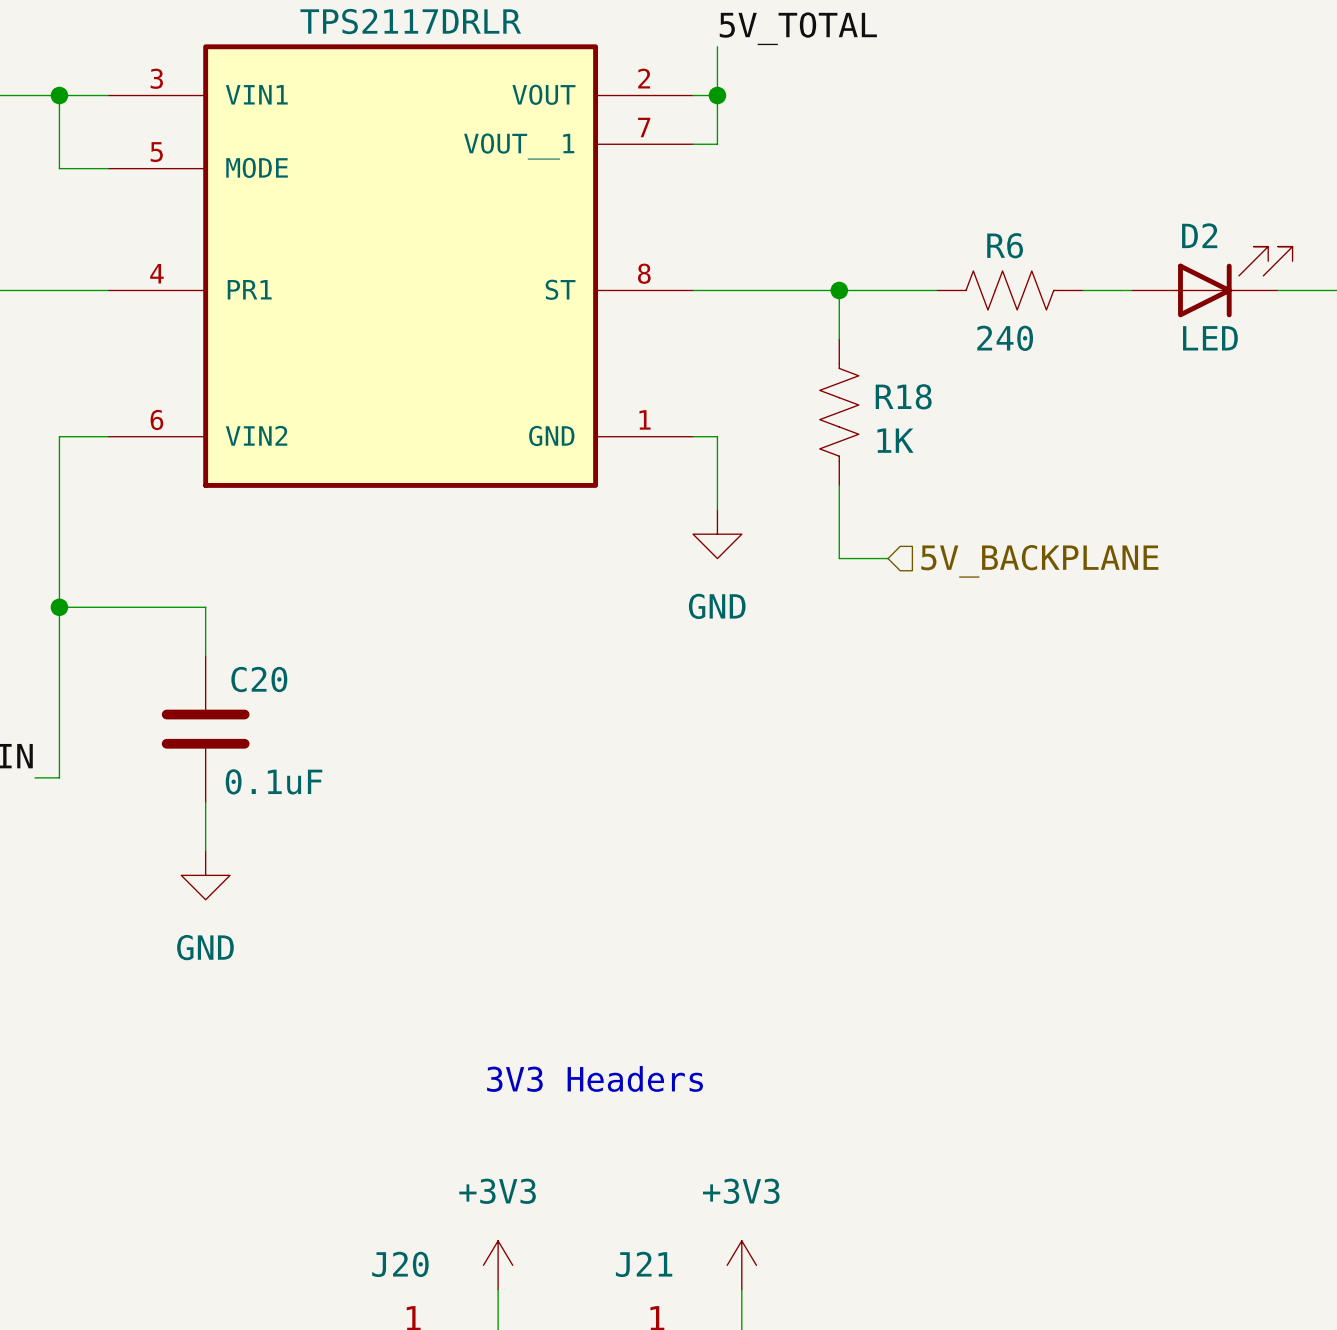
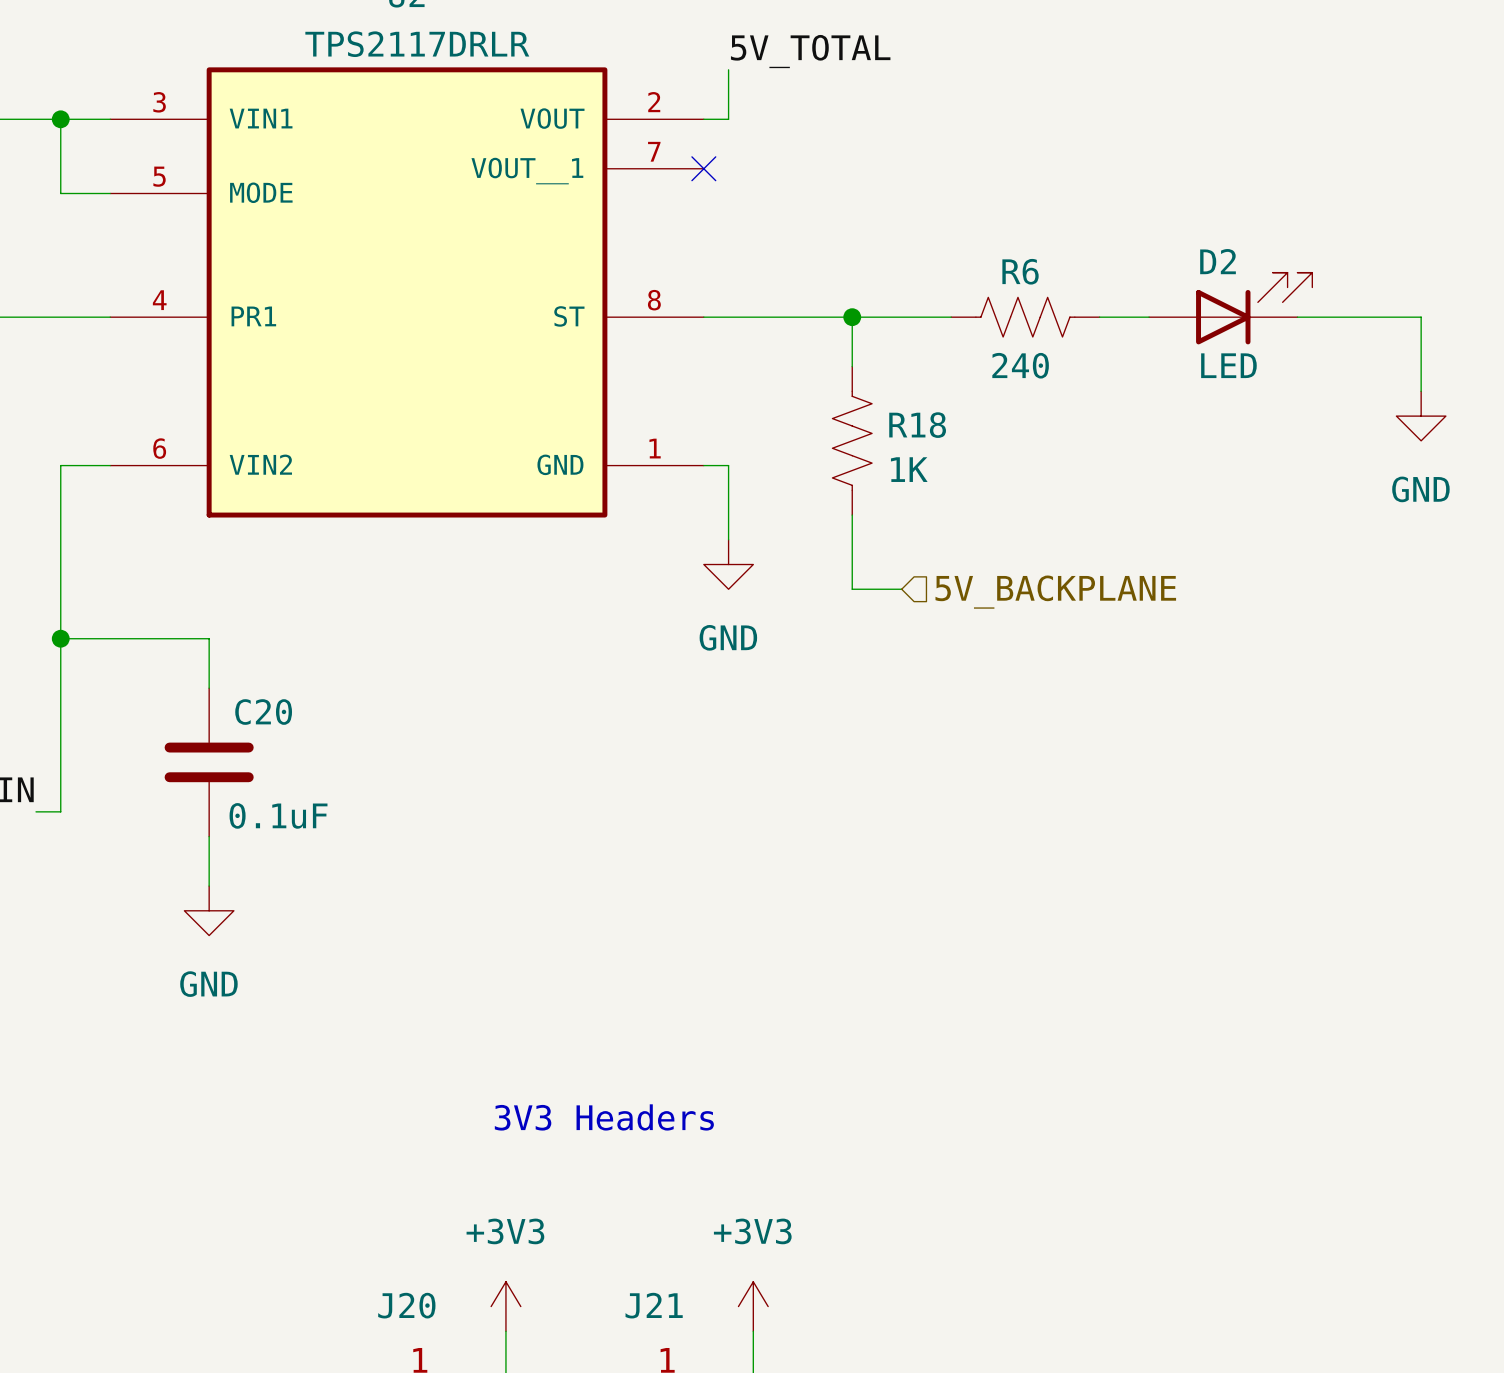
wire: (717, 95) (717, 144) (693, 144) -> none
junction: (717, 95) -> none
no-connect mark: none -> (703, 168)

